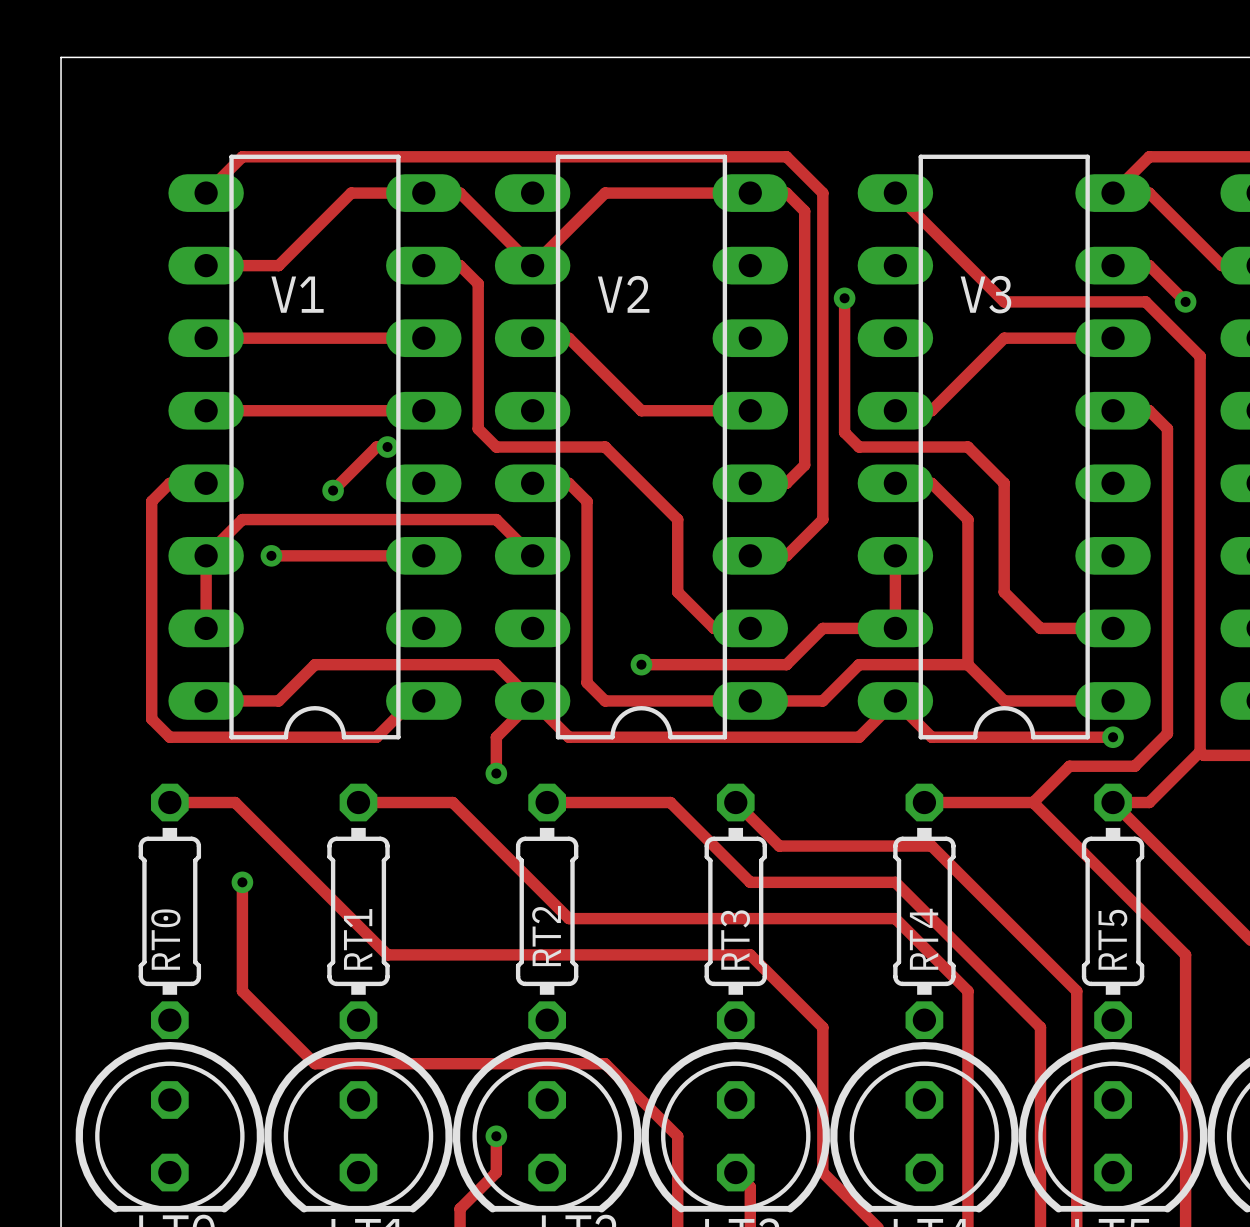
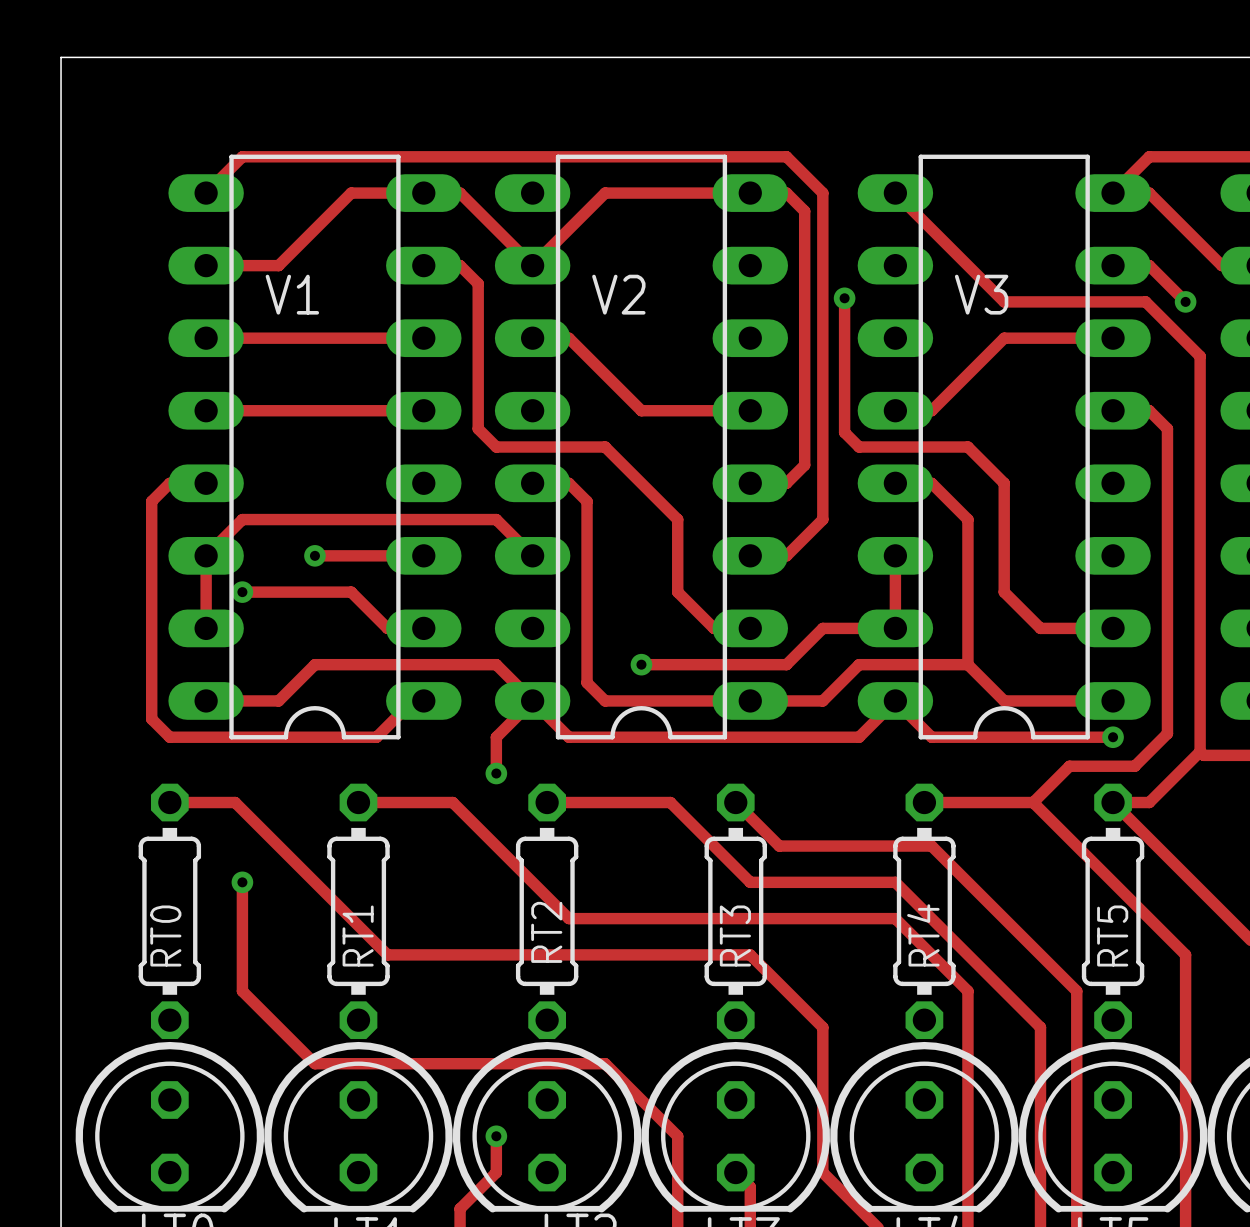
track: (387, 447) (376, 447) (333, 490) -> none
via: (387, 447) -> none
via: (333, 490) -> none
track: (271, 555) (314, 555) -> none
via: (271, 555) -> none
via: none -> (314, 555)
track: none -> (242, 592) (351, 592) (387, 628) (423, 628)
via: none -> (242, 592)

